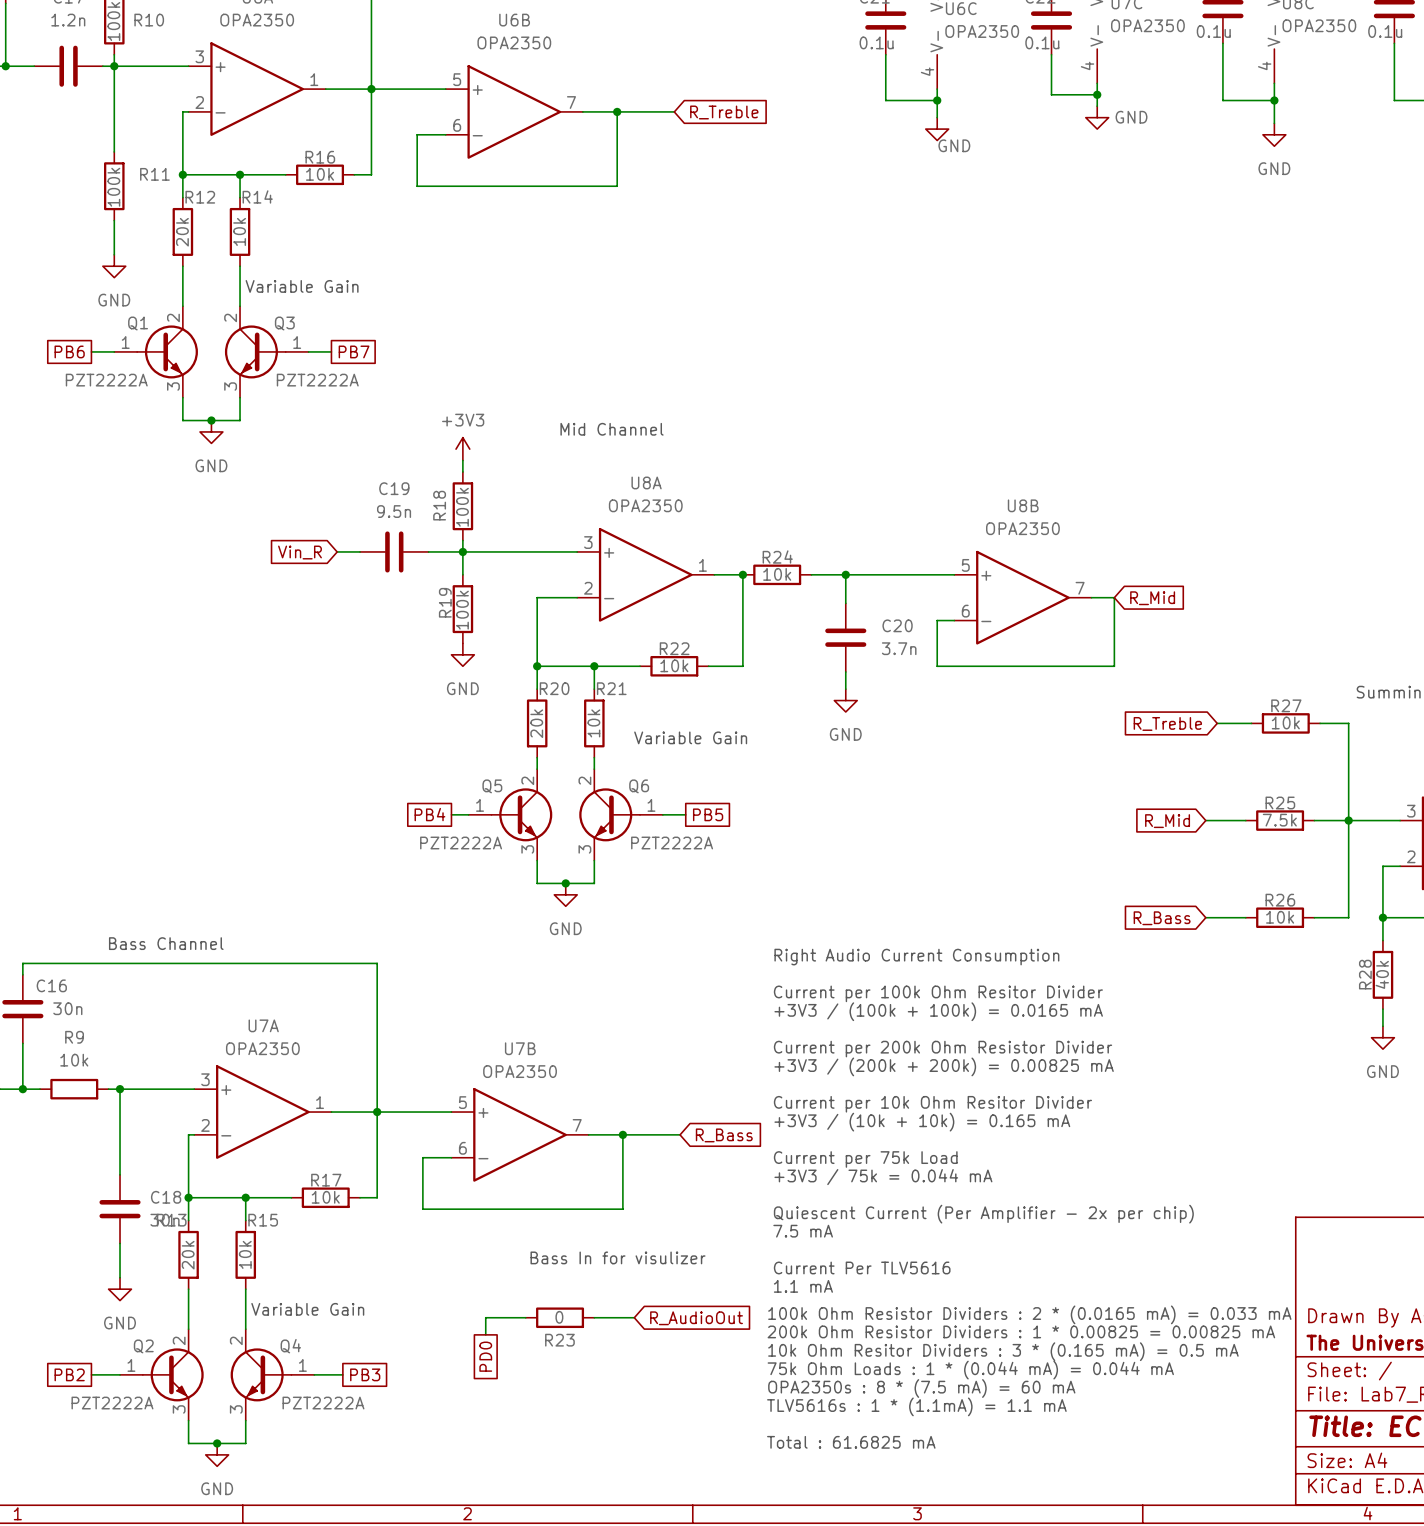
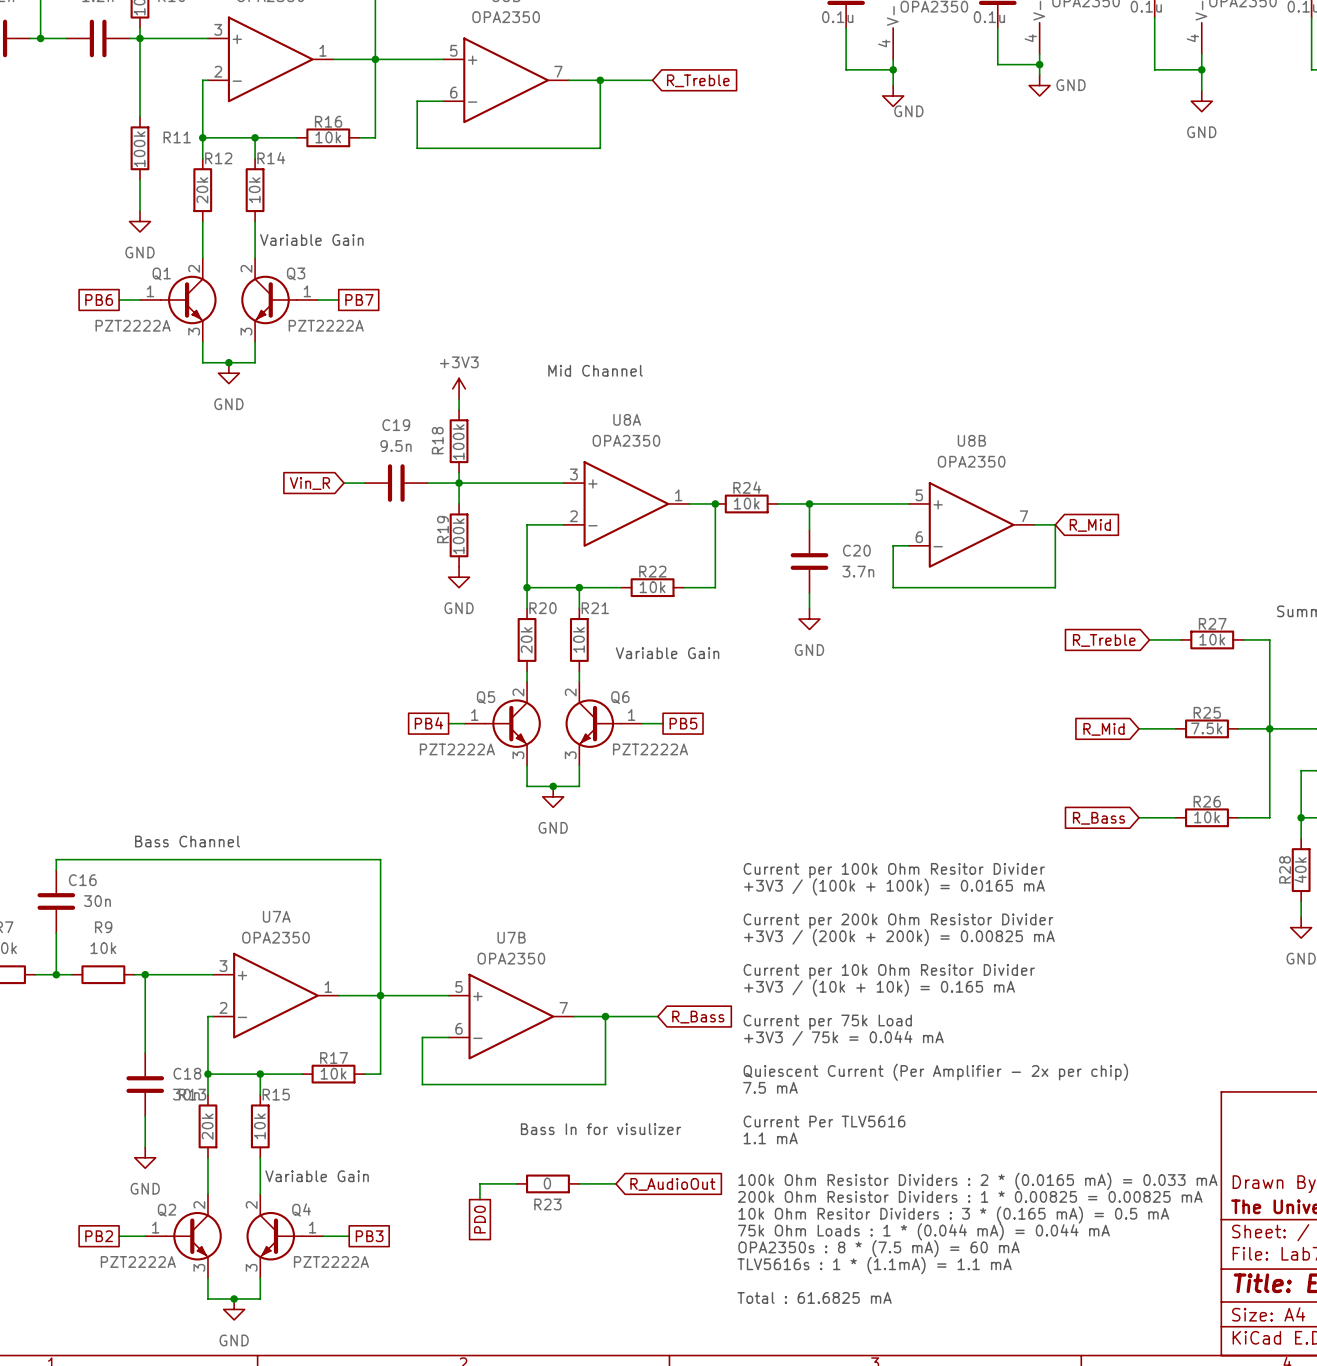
text: Right Audio Current Consumption (916, 957) -> none
text: none -> Current per 100k Ohm Resitor Divider (894, 870)
text: Current per 100k Ohm Resitor Divider (938, 993) -> +3V3 / (100k + 100k) = 0.0165 mA (894, 886)
text: +3V3 / (100k + 100k) = 0.0165 mA (938, 1011) -> none
text: none -> Current per 200k Ohm Resistor Divider (898, 921)
text: Current per 200k Ohm Resistor Divider (943, 1049) -> +3V3 / (200k + 200k) = 0.00825 mA (899, 937)
text: +3V3 / (200k + 200k) = 0.00825 mA (944, 1066) -> none
text: none -> Current per 10k Ohm Resitor Divider (889, 971)
text: Current per 10k Ohm Resitor Divider (932, 1104) -> +3V3 / (10k + 10k) = 0.165 mA (879, 988)
text: +3V3 / (10k + 10k) = 0.165 mA (922, 1122) -> none
text: none -> Current per 75k Load (827, 1022)
text: Current per 75k Load (865, 1159) -> +3V3 / 75k = 0.044 mA (843, 1038)
text: +3V3 / 75k = 0.044 mA (883, 1177) -> none
text: none -> Quiescent Current (Per Amplifier - 2x per chip) (935, 1072)
text: Quiescent Current (Per Amplifier - 2x per chip) (983, 1214) -> 7.5 mA (770, 1087)
text: 7.5 mA (803, 1231) -> none
text: none -> Current Per TLV5616 (824, 1121)
text: Current Per TLV5616 (862, 1267) -> 1.1 mA (770, 1138)
text: 1.1 mA (803, 1286) -> none

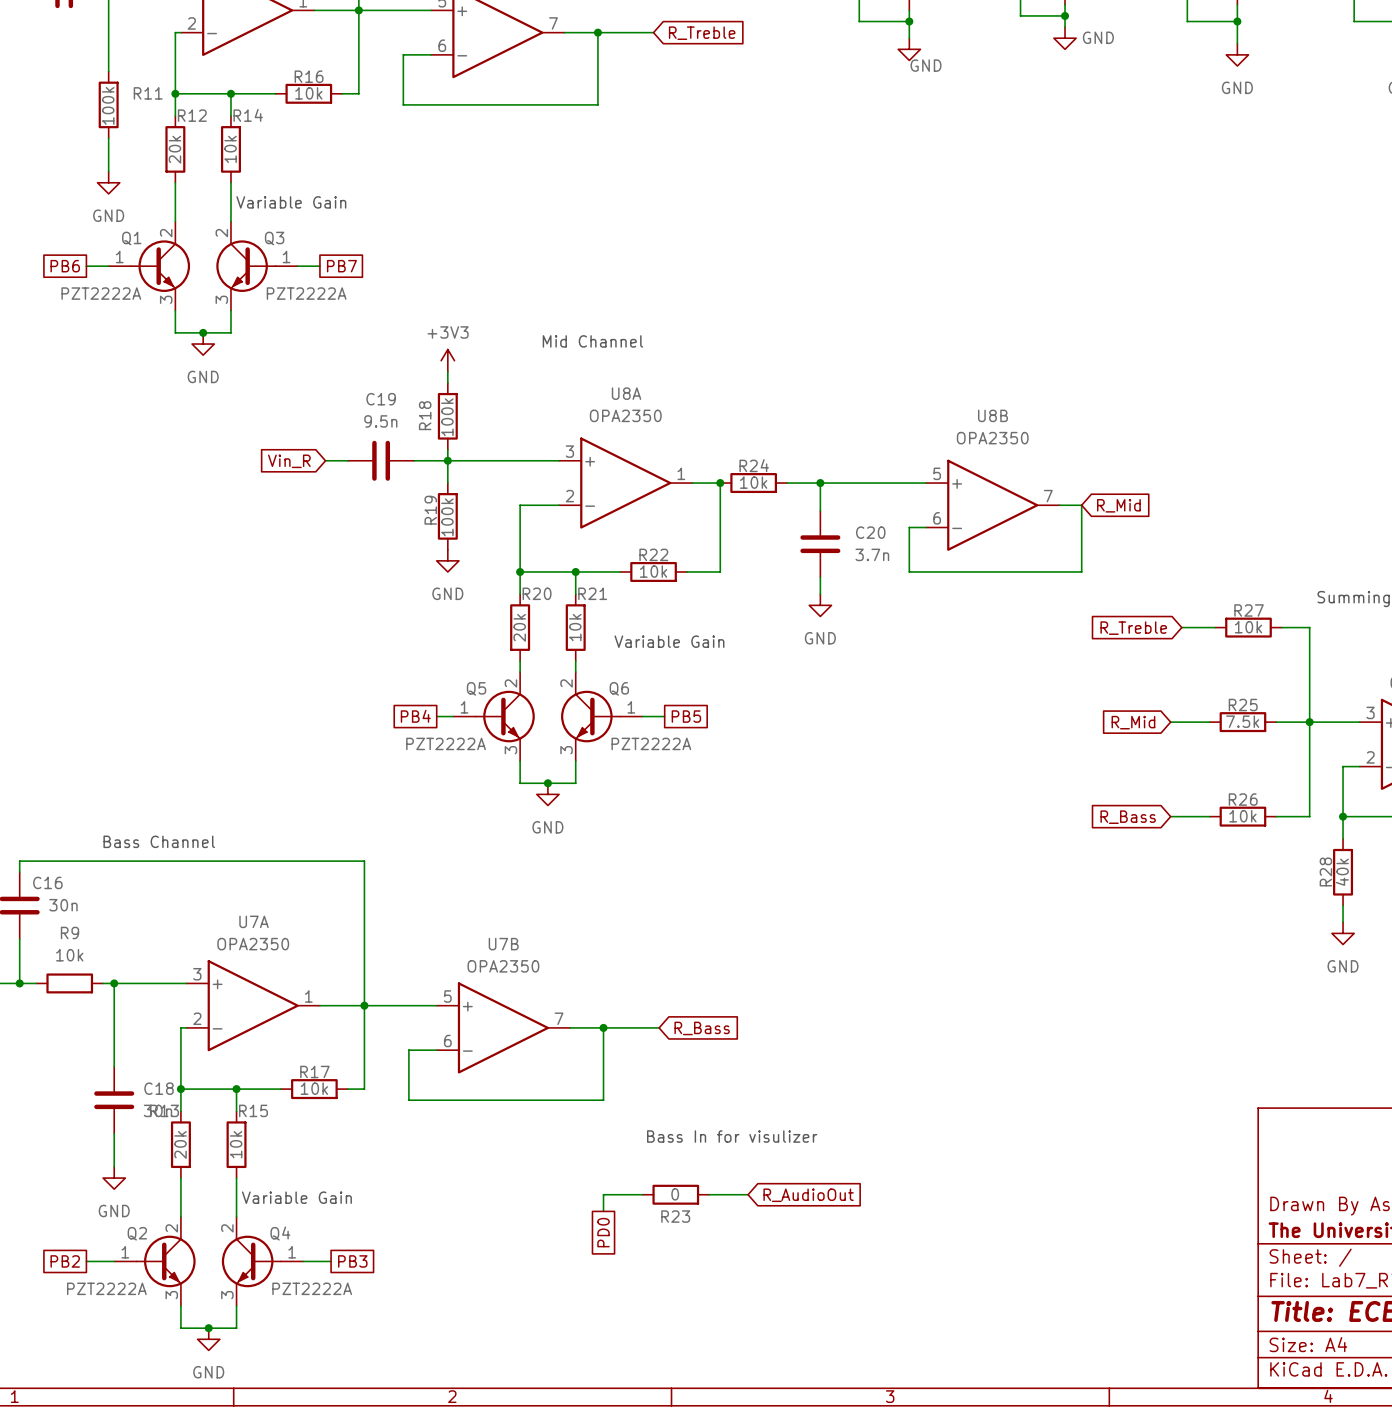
text: Current per 100k Ohm Resitor Divider (894, 870) -> none
text: +3V3 / (100k + 100k) = 0.0165 mA (894, 886) -> none
text: Current per 200k Ohm Resistor Divider (898, 921) -> none
text: +3V3 / (200k + 200k) = 0.00825 mA (899, 937) -> none
text: Current per 10k Ohm Resitor Divider (889, 971) -> none
text: +3V3 / (10k + 10k) = 0.165 mA (879, 988) -> none
text: Current per 75k Load (827, 1022) -> none
text: +3V3 / 75k = 0.044 mA (843, 1038) -> none
text: Quiescent Current (Per Amplifier - 2x per chip) (935, 1072) -> none
text: 7.5 mA (770, 1087) -> none
text: Current Per TLV5616 (824, 1121) -> none
text position: Bass In for visulizer (601, 1129) -> Bass In for visulizer (732, 1136)
text: 1.1 mA (770, 1138) -> none
text: 100k Ohm Resistor Dividers : 2 * (0.0165 mA) = 0.033 mA (977, 1181) -> none
wire: (516, 1183) (479, 1183) (479, 1199) -> (642, 1194) (603, 1194) (603, 1211)
R23 position: (547, 1183) -> (675, 1194)
wire: (579, 1183) (615, 1183) -> (709, 1194) (748, 1194)
global label position: R_AudioOut (672, 1184) -> R_AudioOut (808, 1195)
text: 200k Ohm Resistor Dividers : 1 * 0.00825 = 0.00825 mA (970, 1196) -> none
text: 10k Ohm Resitor Dividers : 3 * (0.165 mA) = 0.5 mA (953, 1214) -> none
global label position: PD0 (479, 1219) -> PD0 (603, 1232)
text: 75k Ohm Loads : 1 * (0.044 mA) = 0.044 mA (923, 1231) -> none
text: OPA2350s : 8 * (7.5 mA) = 60 mA (879, 1248) -> none
text: TLV5616s : 1 * (1.1mA) = 1.1 mA (874, 1265) -> none
text: Total : 61.6825 mA (814, 1297) -> none

